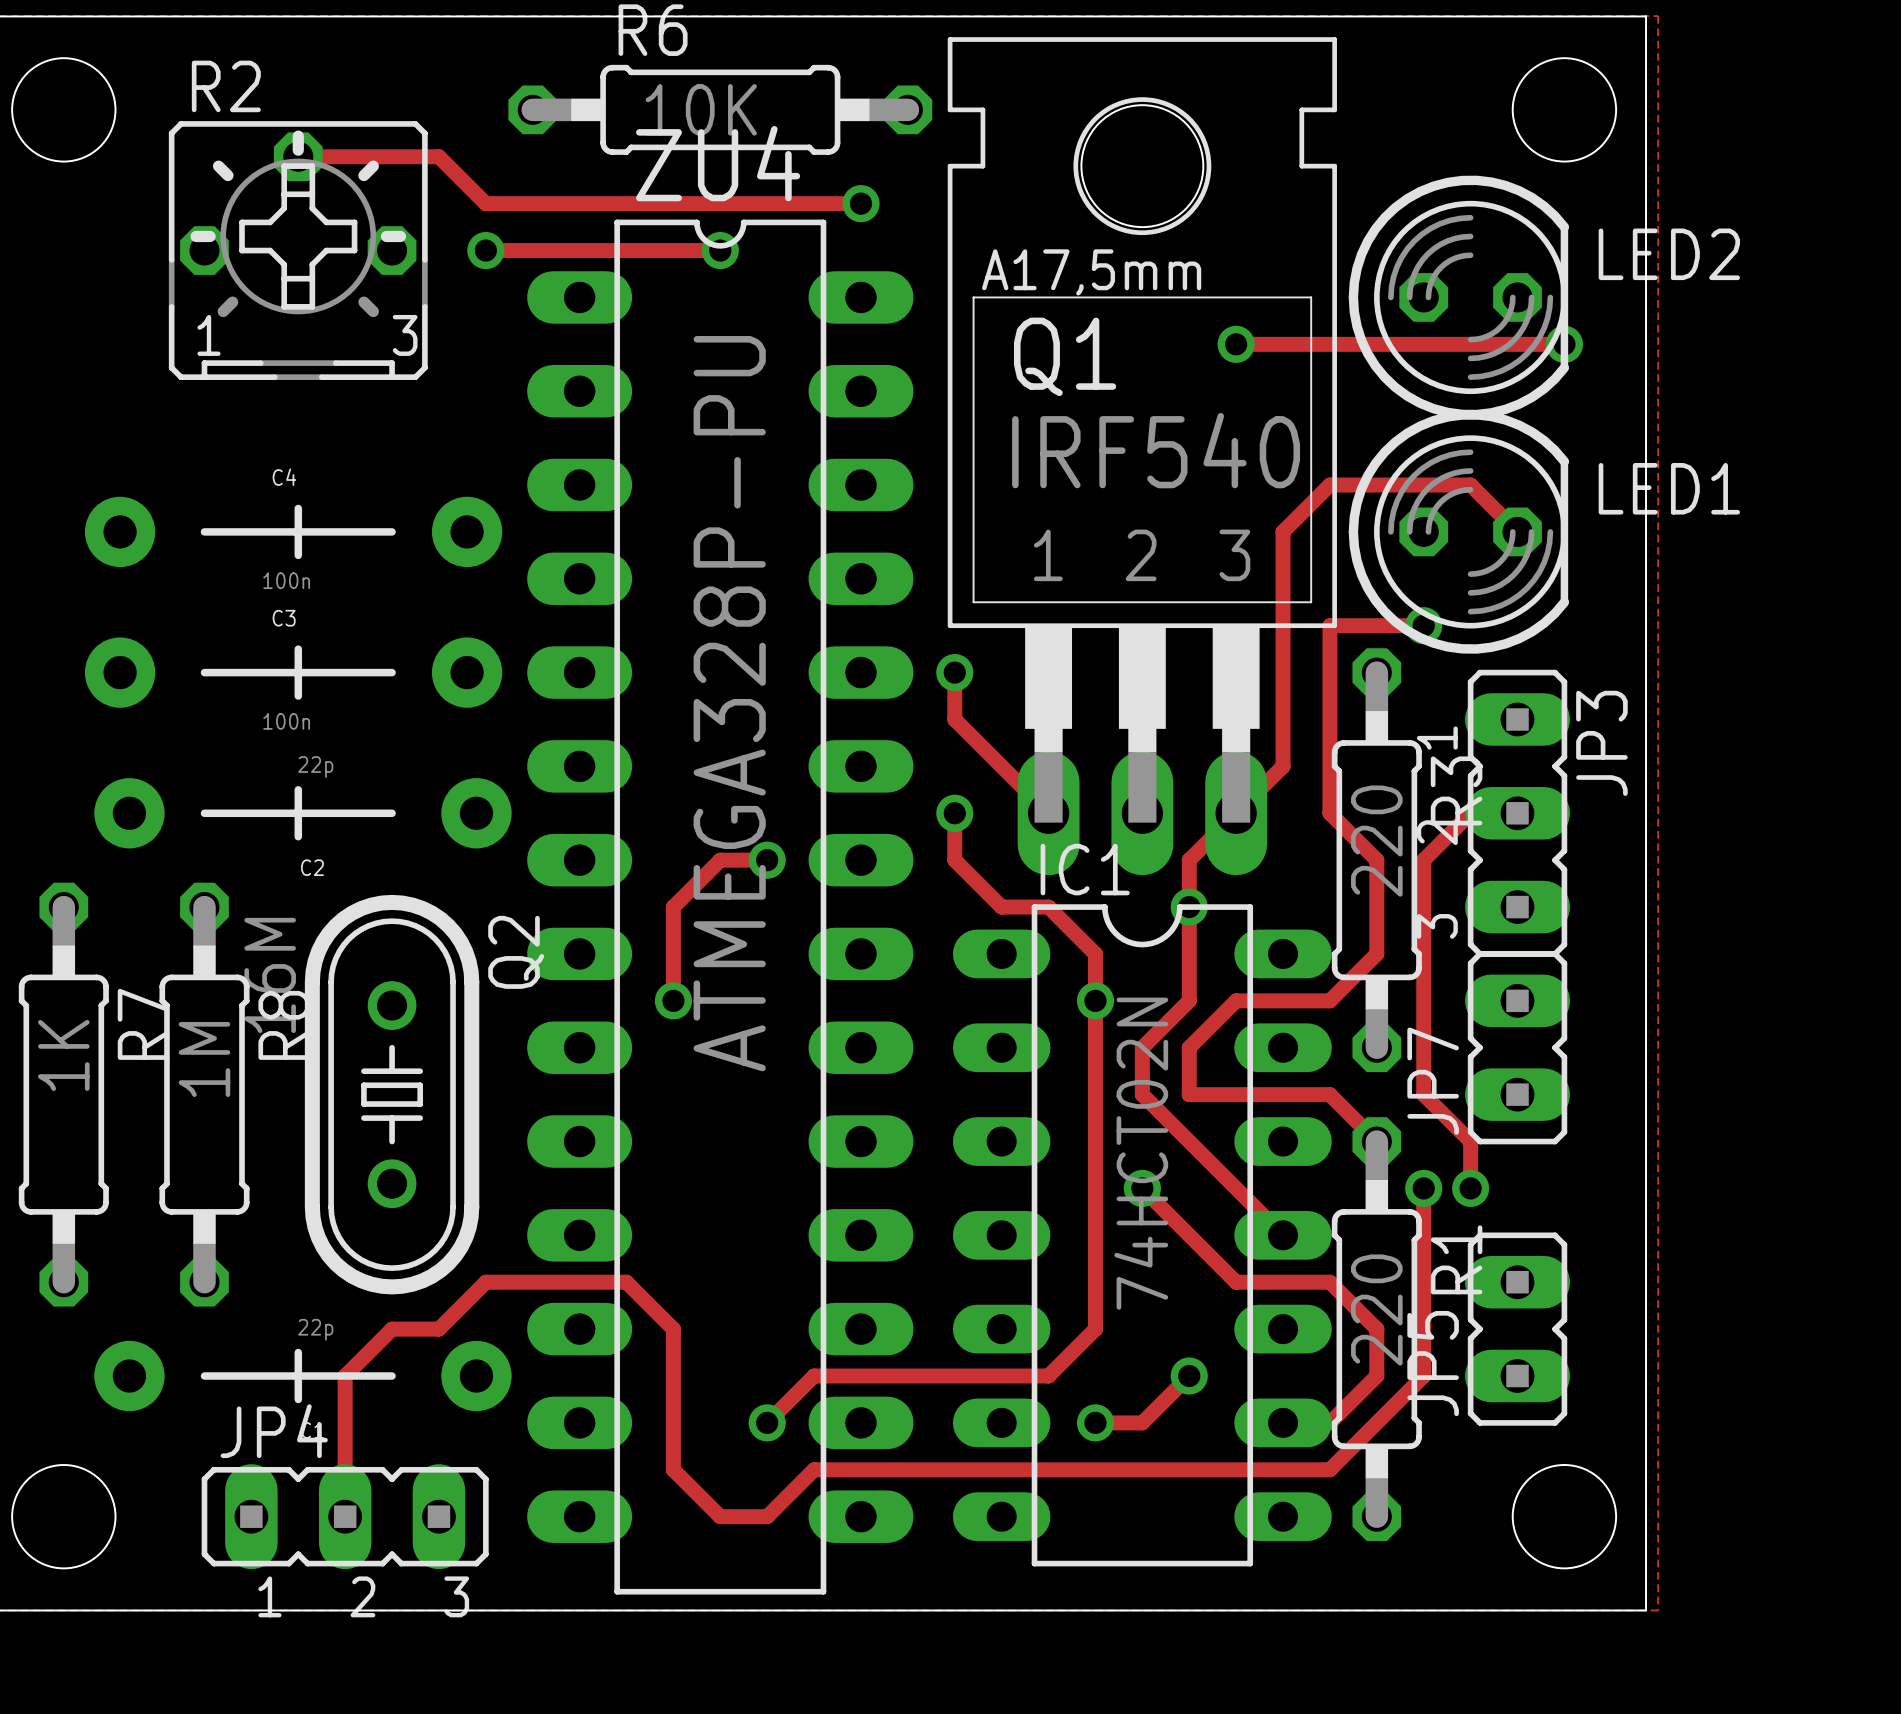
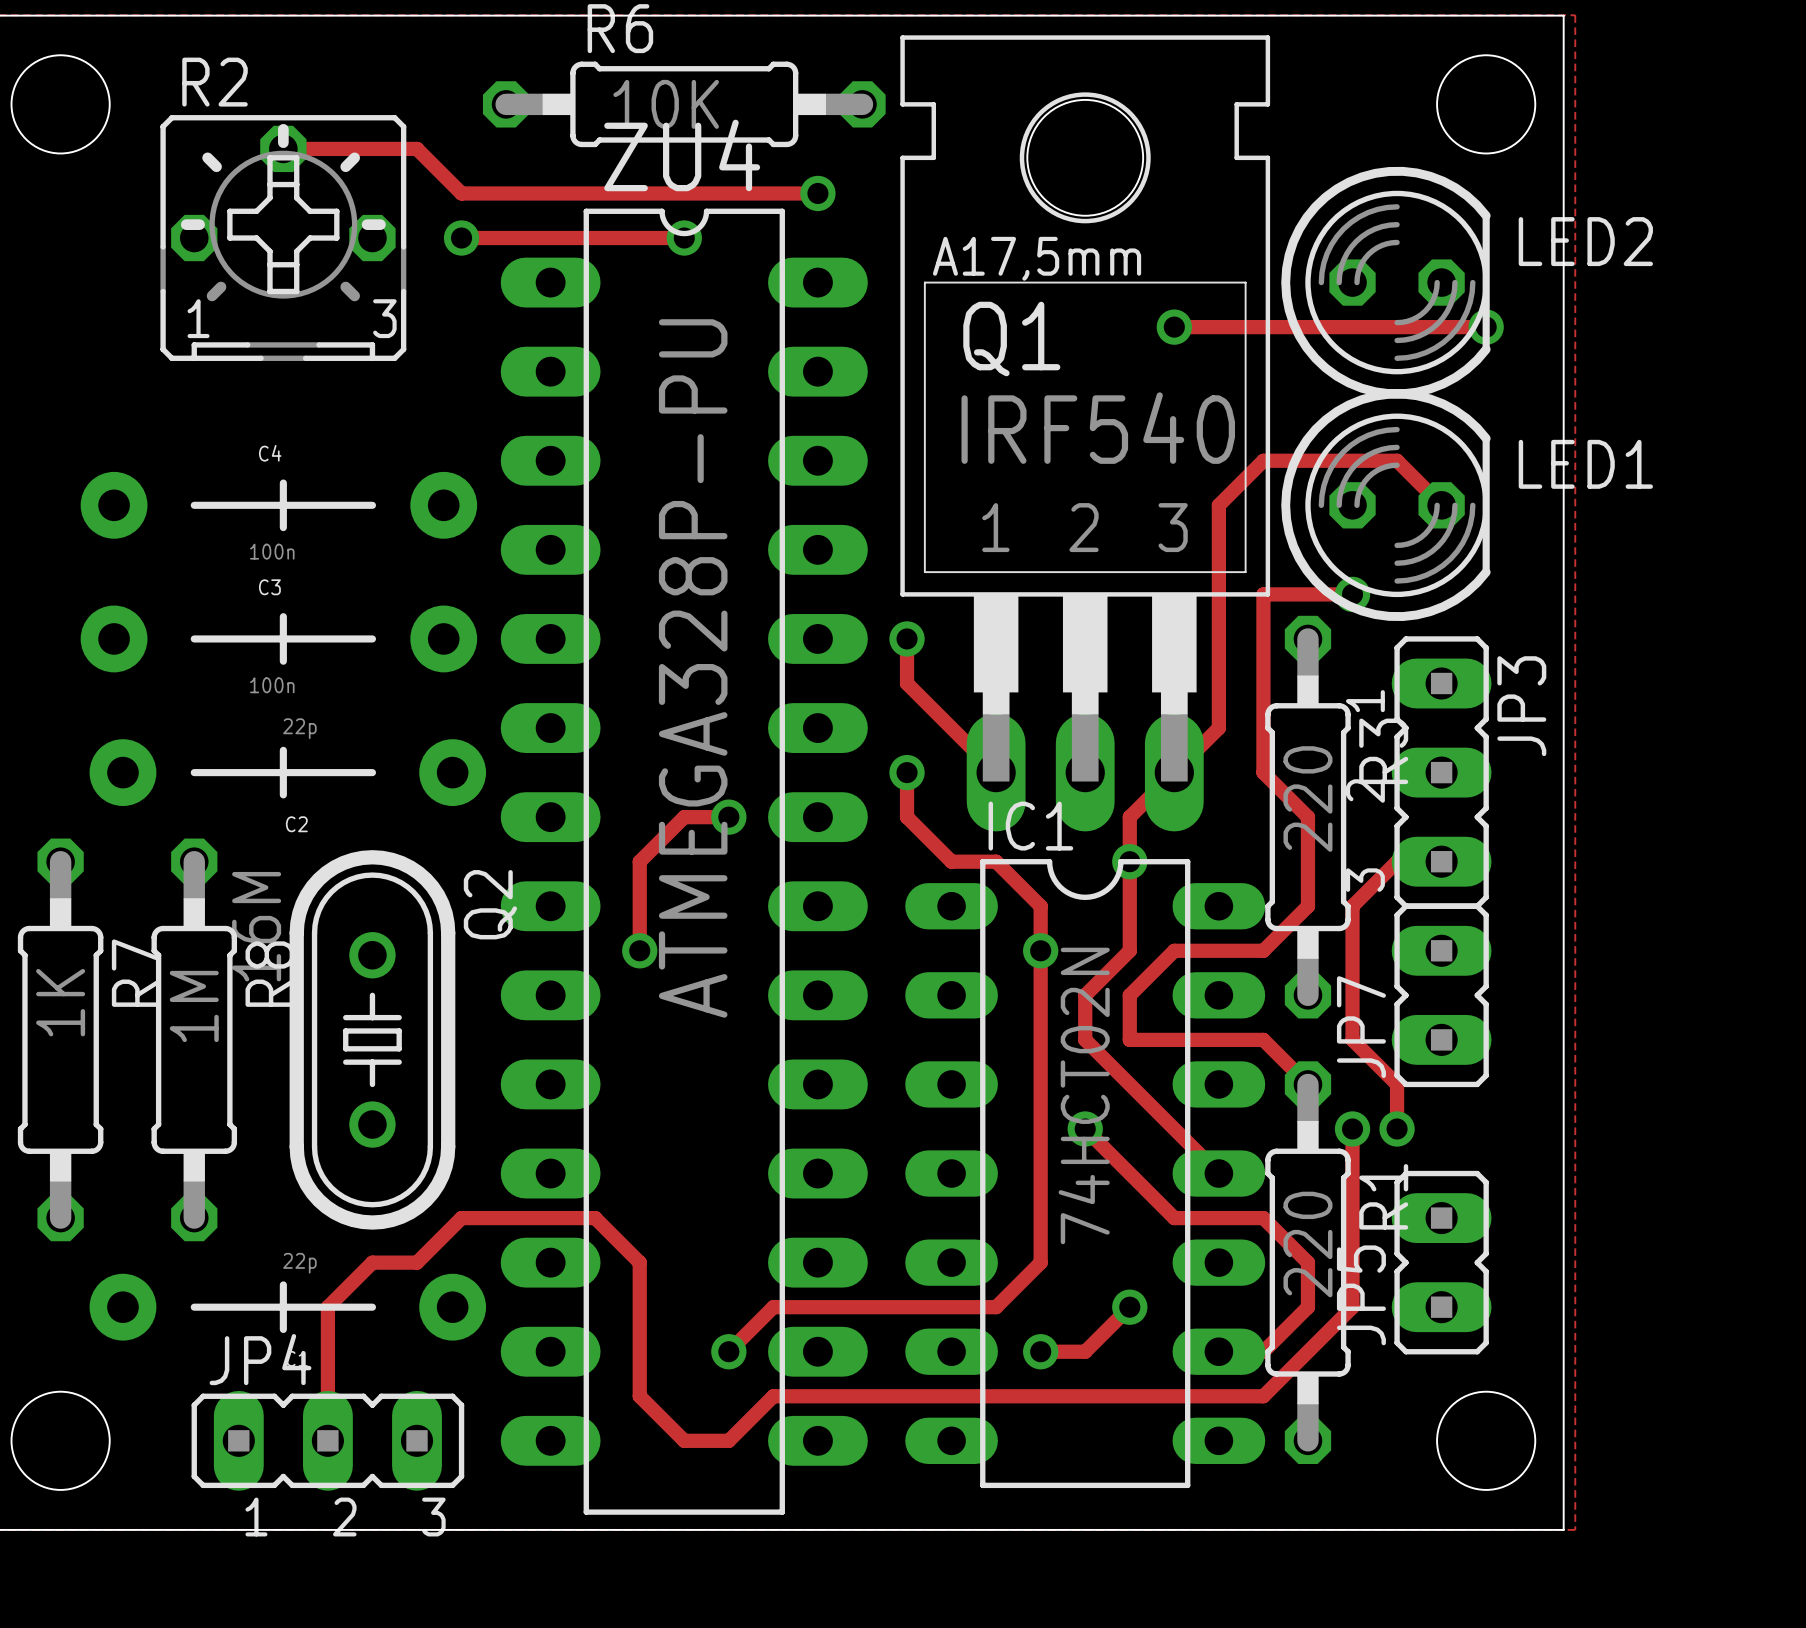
track: (1470, 813) (1423, 860) (1423, 953) -> (1441, 861) (1397, 861) (1352, 906)

